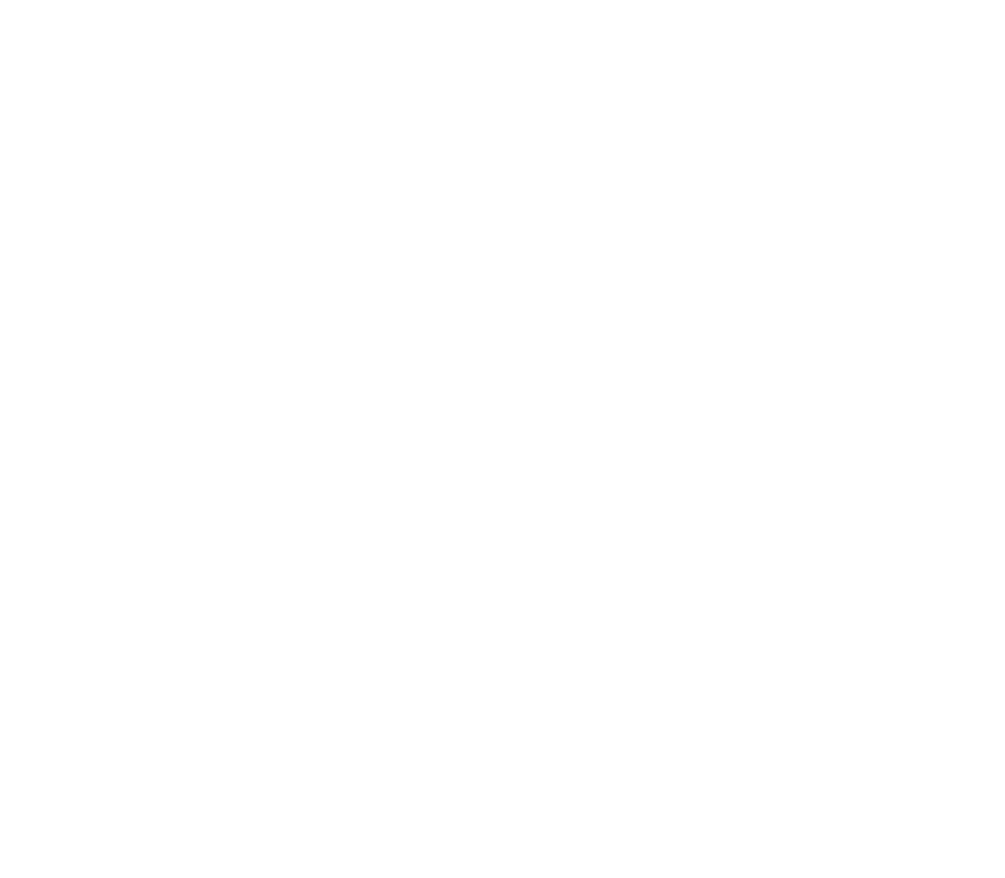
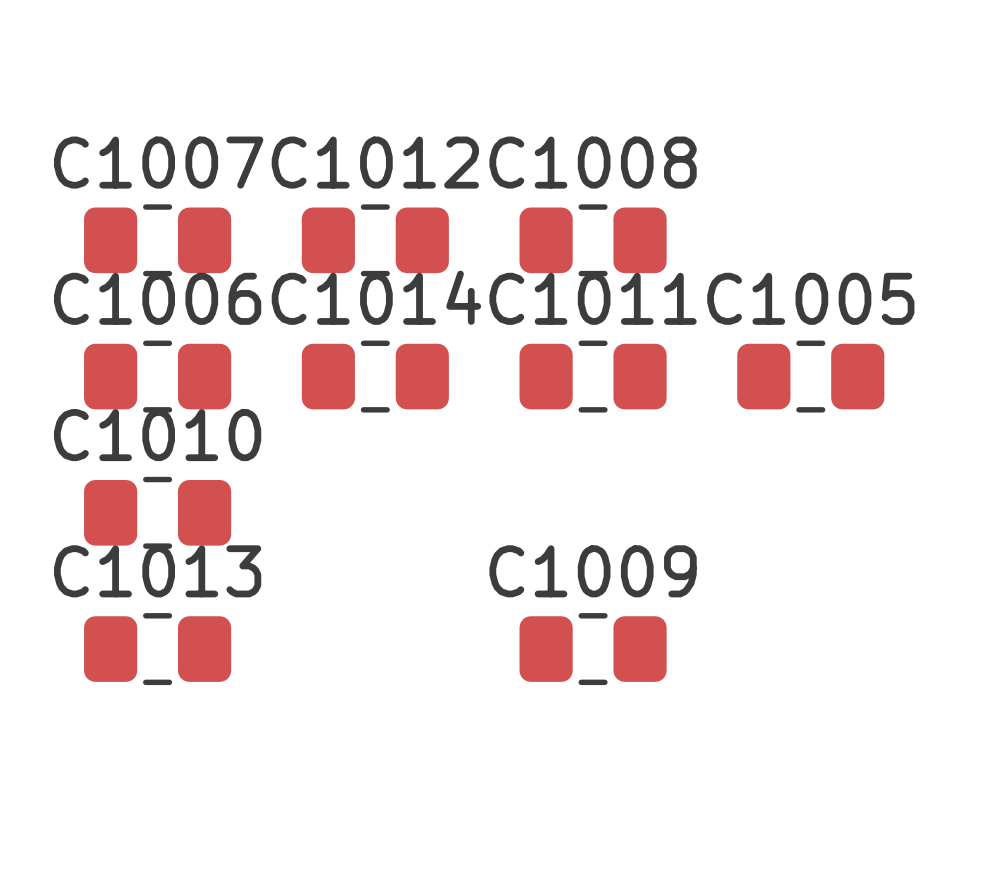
C1007: none -> (157, 240)
C1012: none -> (375, 240)
C1008: none -> (593, 240)
C1006: none -> (157, 376)
C1014: none -> (375, 376)
C1011: none -> (593, 376)
C1005: none -> (810, 376)
C1010: none -> (157, 512)
C1013: none -> (157, 649)
C1009: none -> (593, 649)

